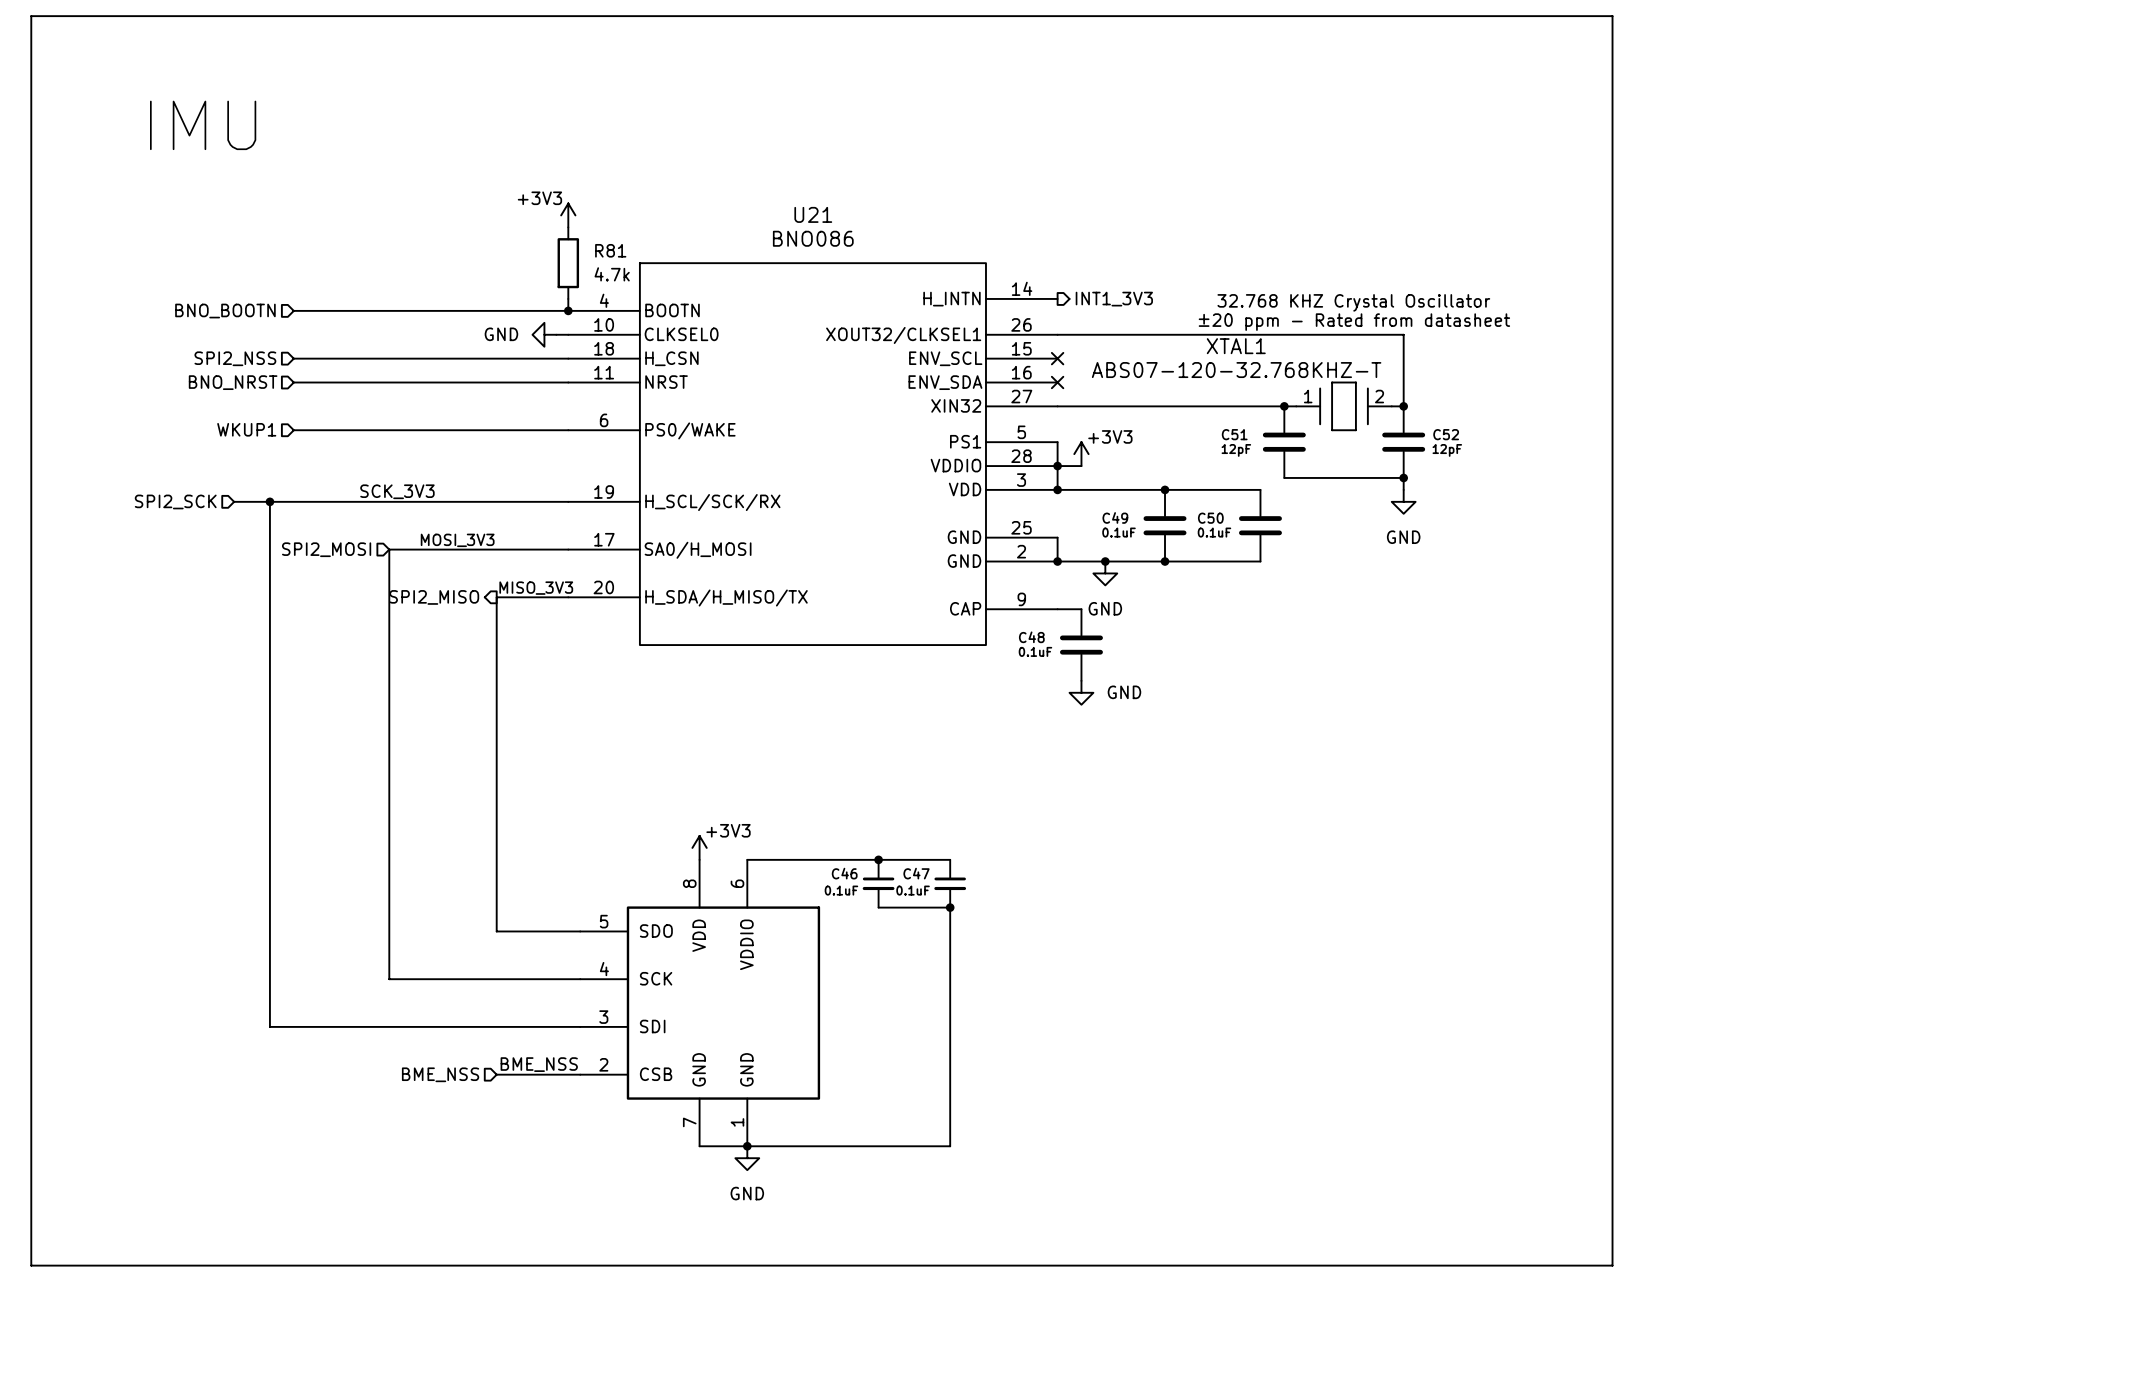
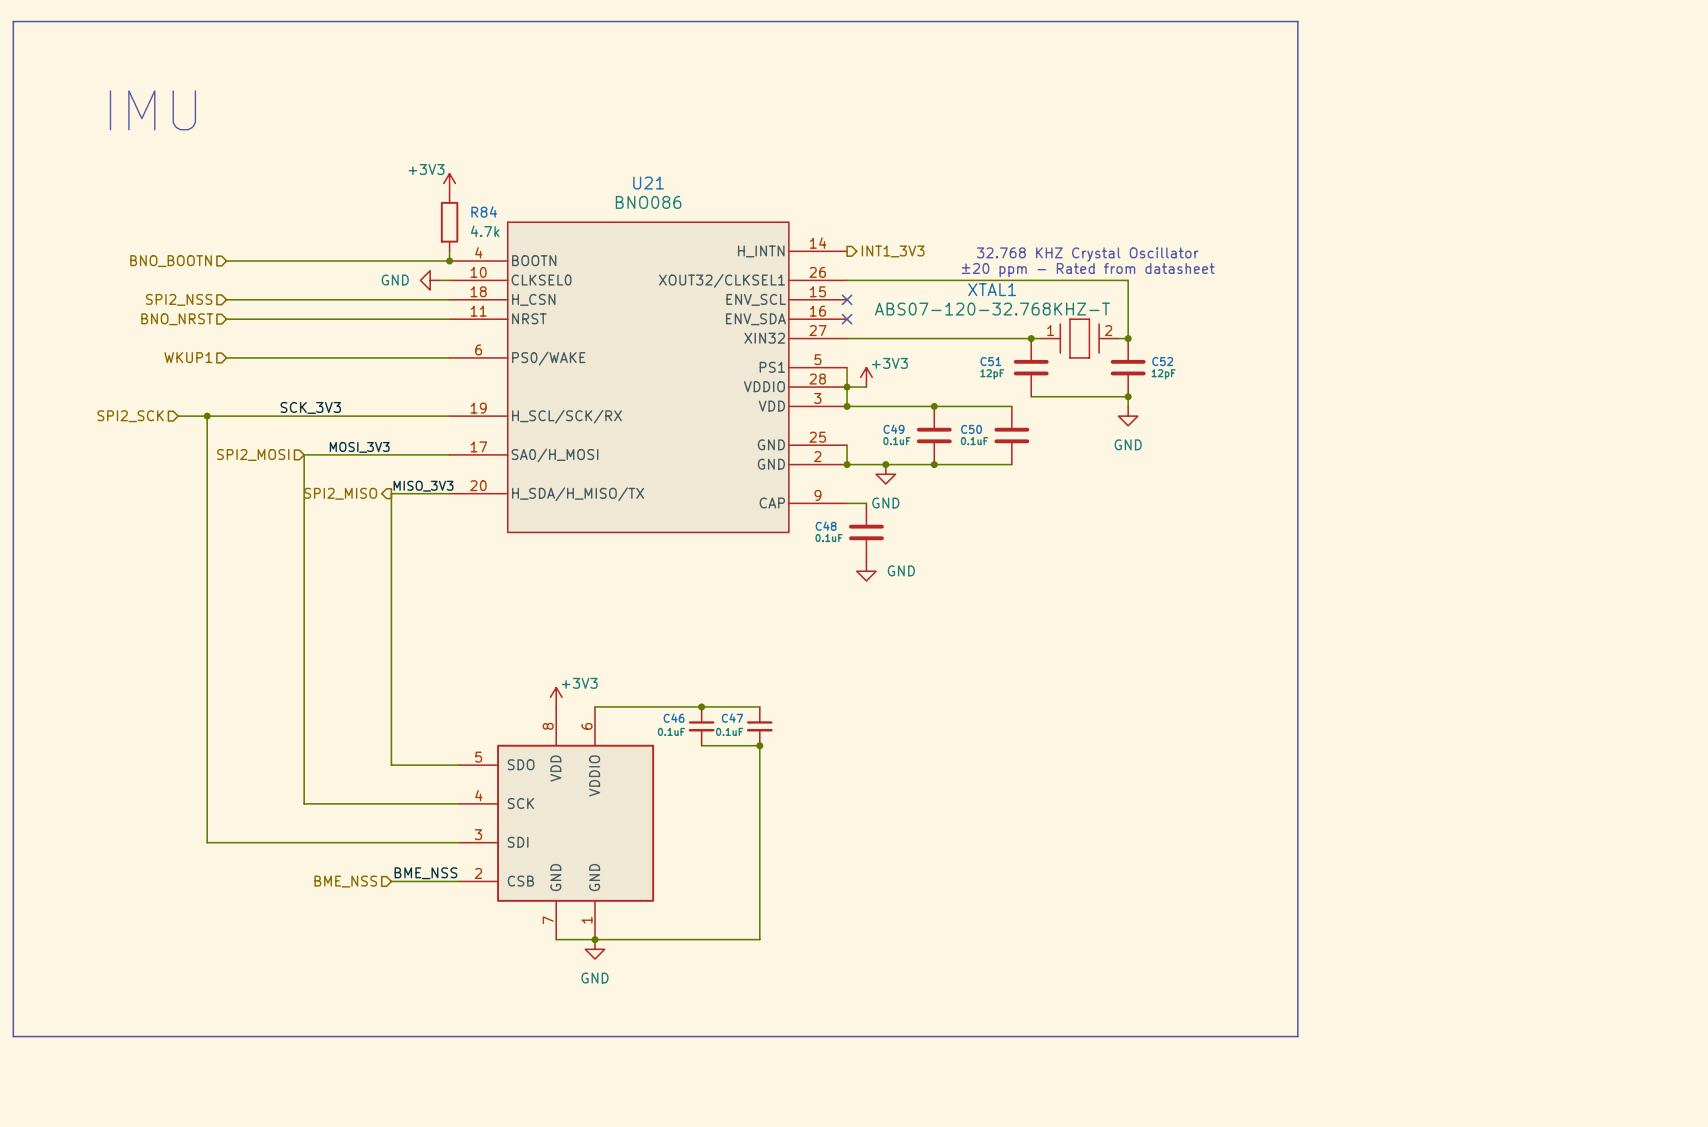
R81 name: R81 (610, 250) -> R84 (484, 211)

